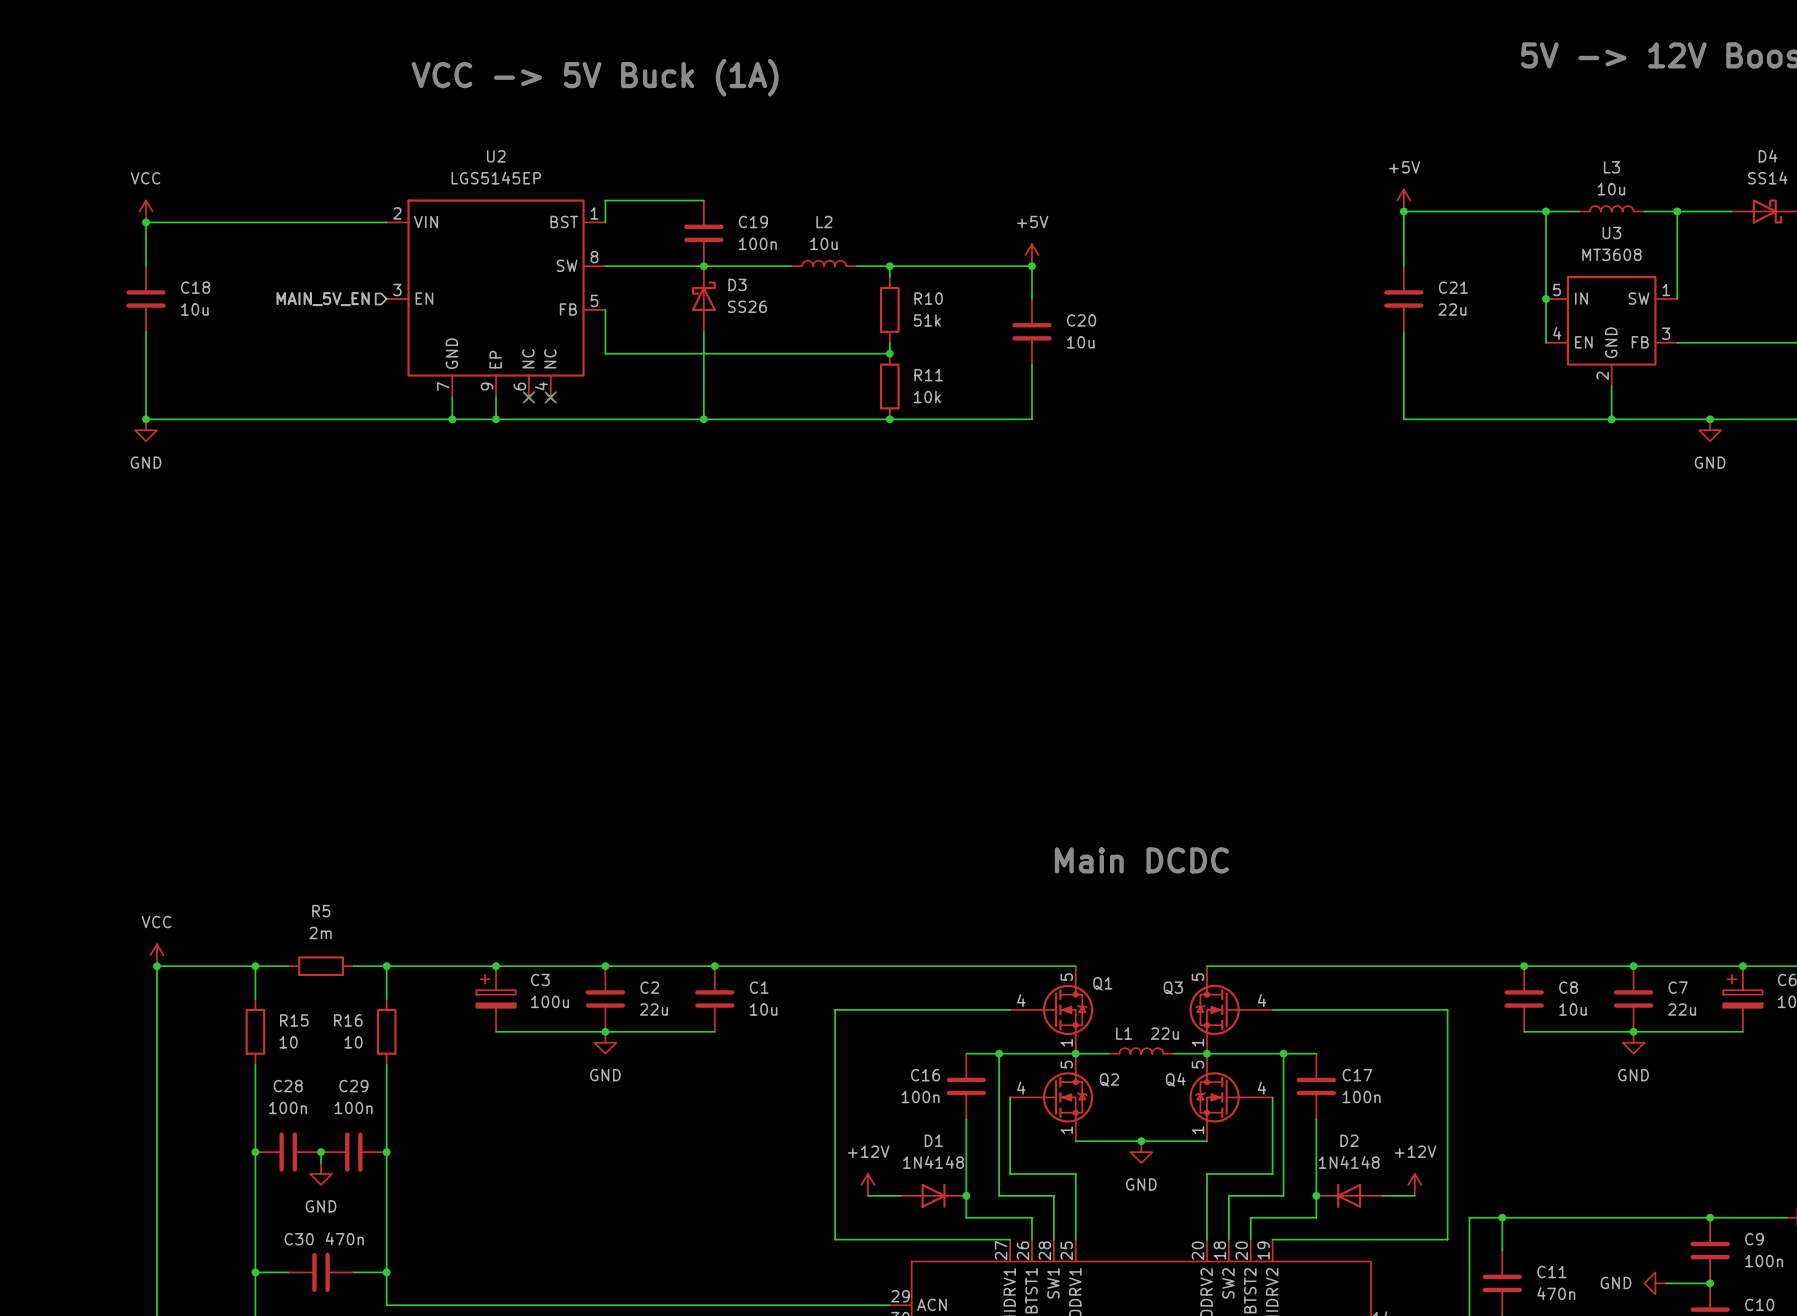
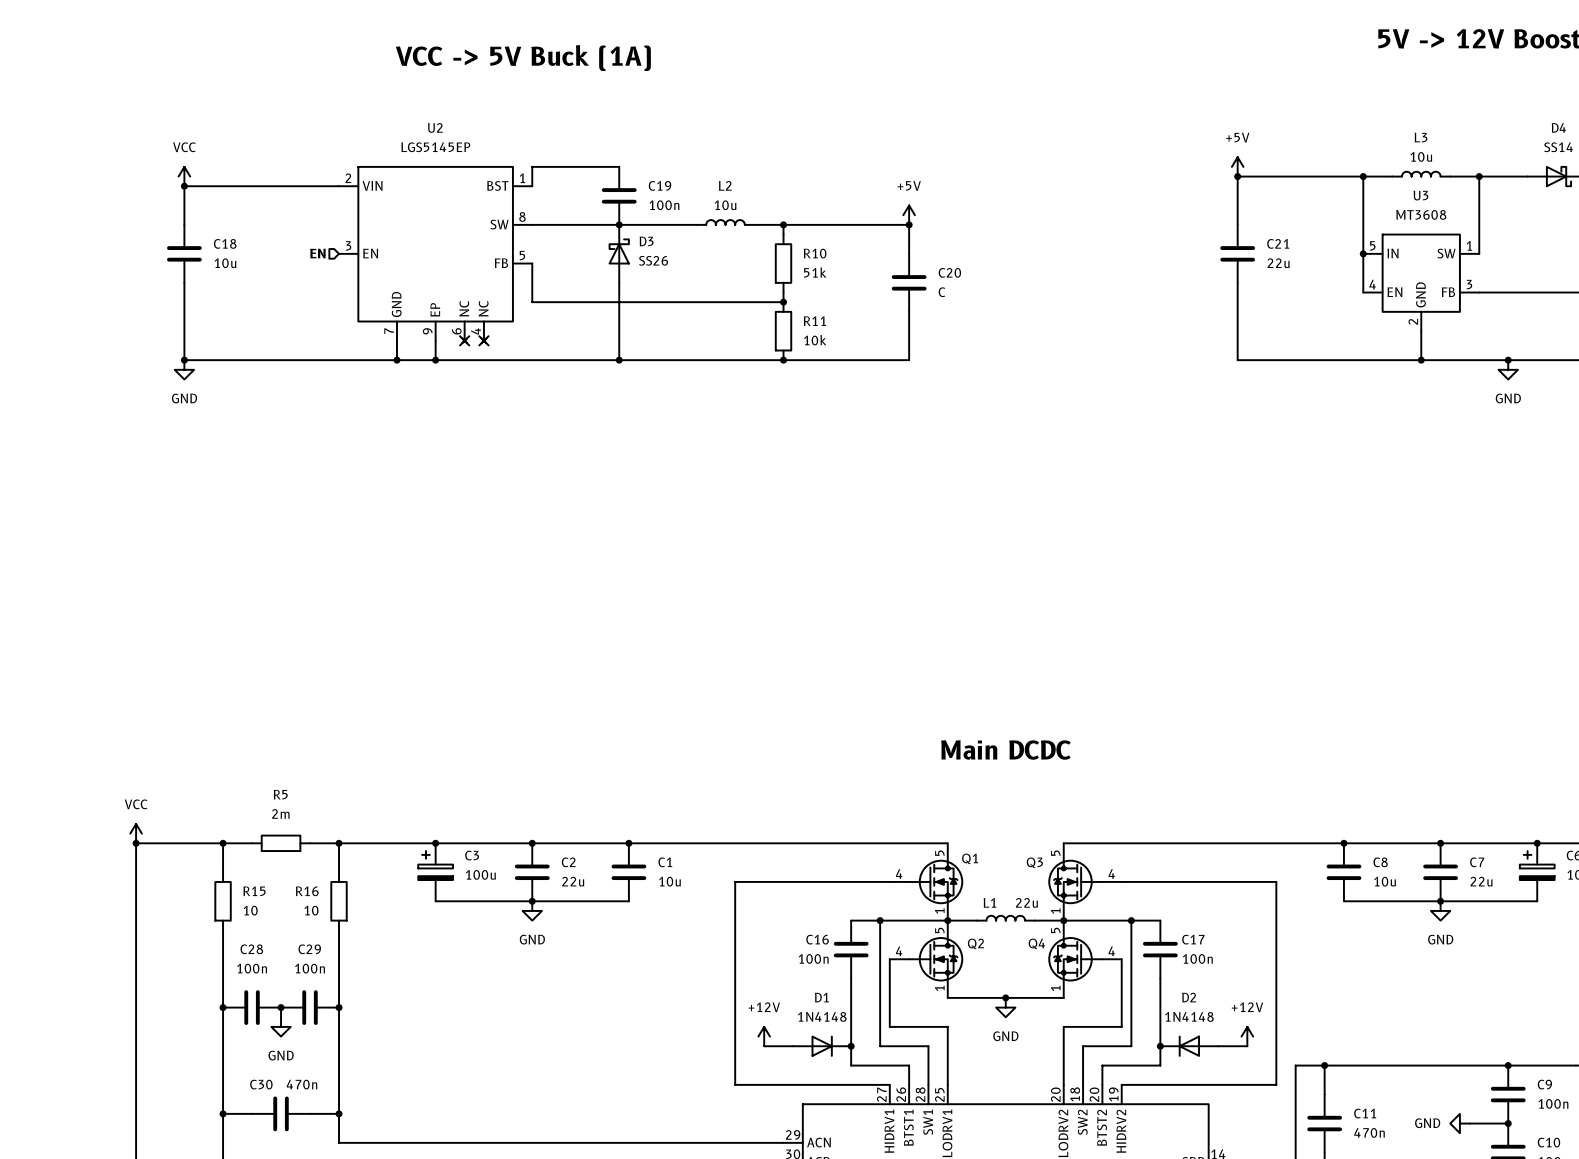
power symbol position: VCC (146, 211) -> VCC (184, 176)
junction: (146, 222) -> none
wire: (211, 222) (146, 222) (146, 266) -> (184, 186) (184, 224)
junction: none -> (184, 186)
C18 position: (146, 298) -> (184, 253)
hierarchical label: MAIN_5V_EN (323, 299) -> EN (317, 253)
wire: (146, 331) (146, 419) (211, 419) -> (184, 282) (184, 360)
C20 value: 10u (1080, 342) -> C (941, 292)
junction: (146, 419) -> none
junction: none -> (184, 360)
power symbol position: GND (146, 430) -> GND (184, 369)

